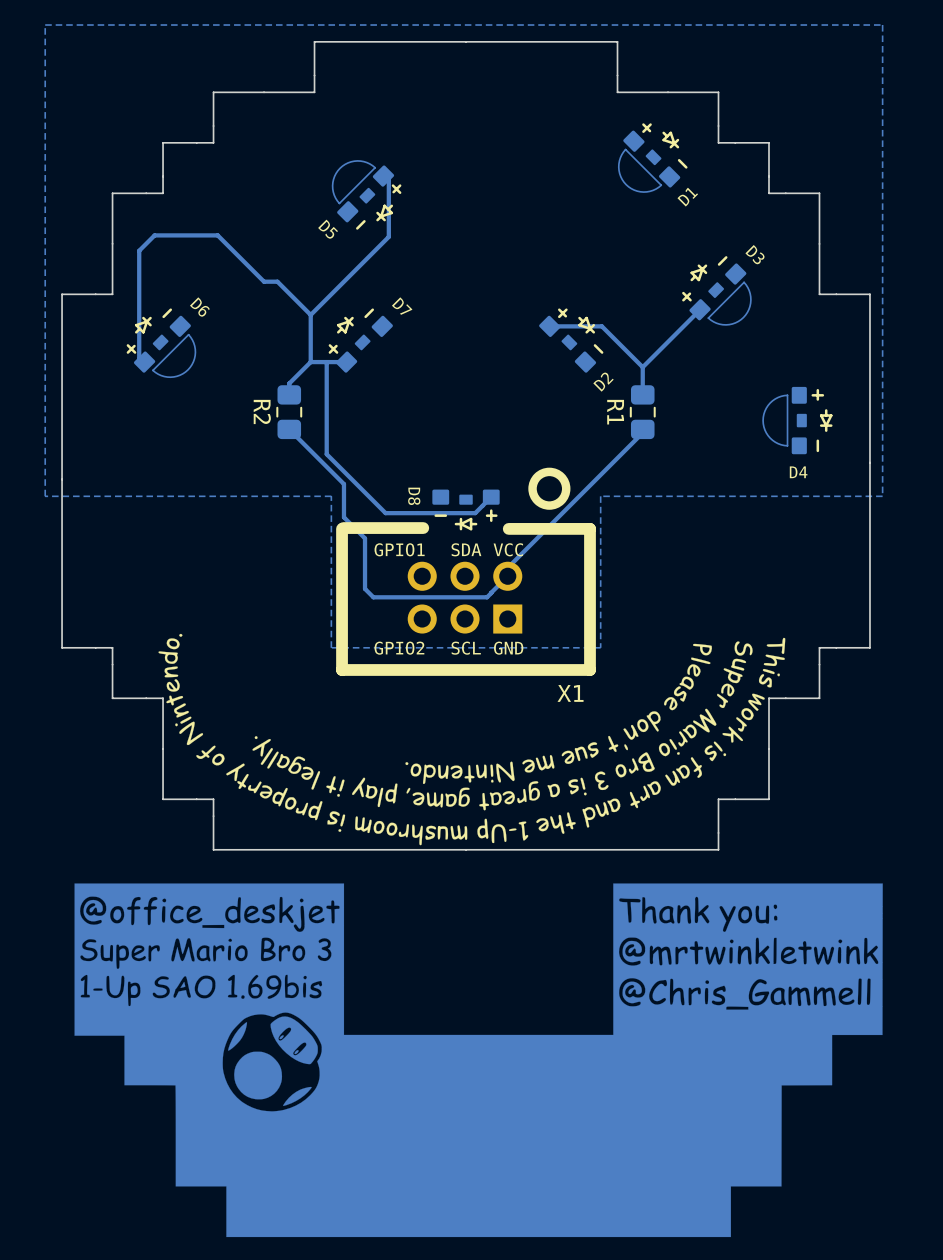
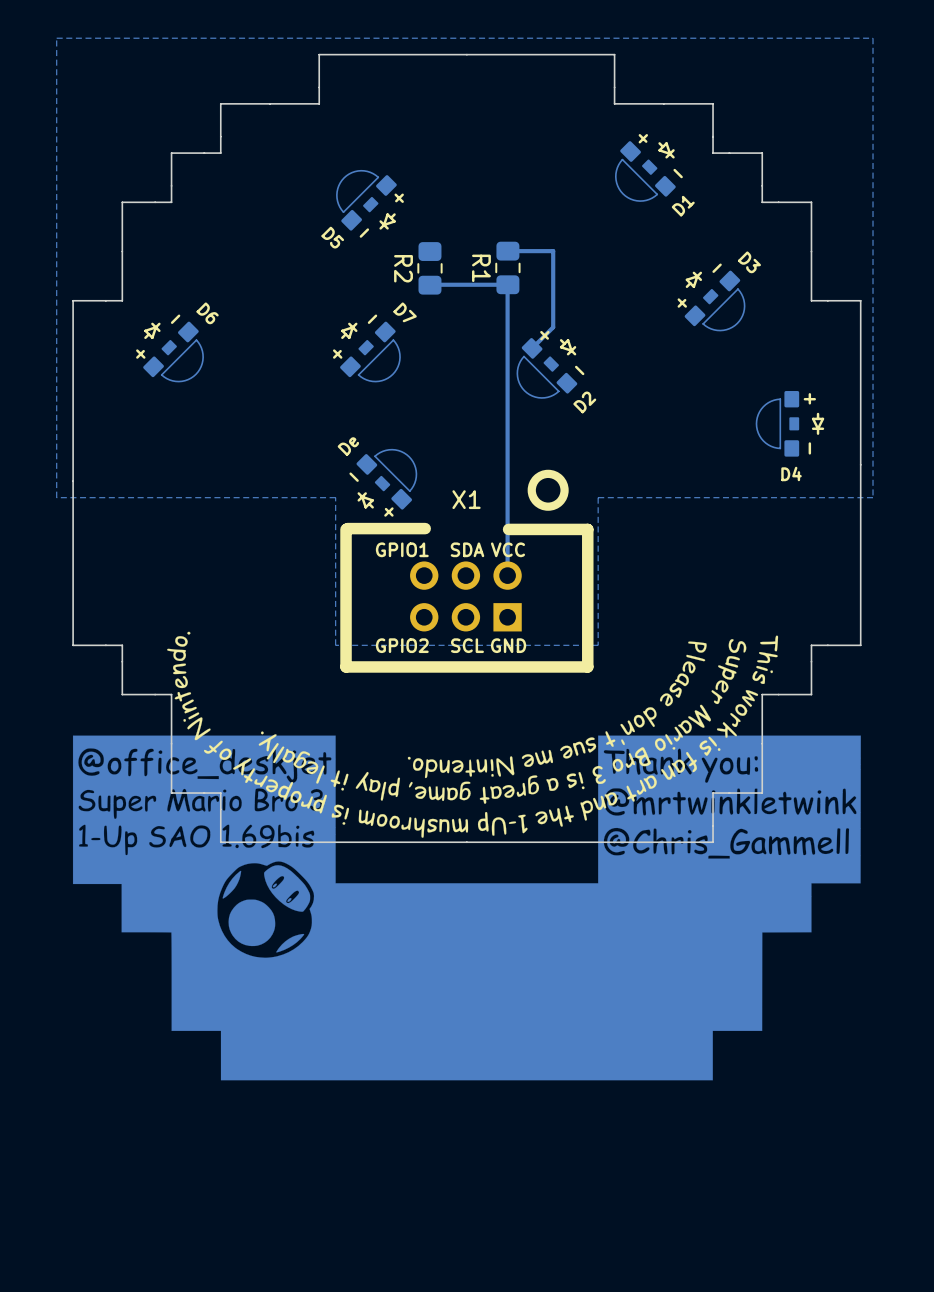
track: (384, 175) (388, 179) (388, 236) (310, 314) -> none
track: none -> (507, 251) (553, 251) (553, 327) (534, 346)
track: none -> (429, 285) (507, 284) (507, 567)
D7 footprint: [328, 308, 393, 373] -> [332, 314, 401, 383]
D2 footprint: [539, 308, 604, 373] -> [516, 330, 585, 399]
track: (698, 311) (642, 367) -> none
track: (310, 314) (310, 362) -> none
track: (310, 314) (277, 281) (264, 281) (217, 235) (154, 235) (139, 250) (139, 358) (143, 362) -> none
track: (549, 326) (601, 326) (642, 367) -> none
track: (310, 362) (289, 383) (289, 394) -> none
track: (326, 362) (326, 454) (385, 513) (475, 513) (491, 497) -> none
track: (346, 362) (310, 362) -> none
track: (642, 367) (642, 394) -> none
R2 position: (289, 412) -> (429, 268)
R1 position: (642, 412) -> (507, 267)
track: (289, 429) (343, 484) (343, 517) (365, 538) (365, 588) (373, 597) (487, 597) (491, 593) -> none
track: (642, 429) (642, 432) (507, 567) (507, 576) (491, 592) -> none
De: none -> (383, 482)
D8: (466, 509) -> none
X1 name position: X1 (570, 693) -> X1 (466, 499)
drawing position: (478, 1060) -> (466, 907)

